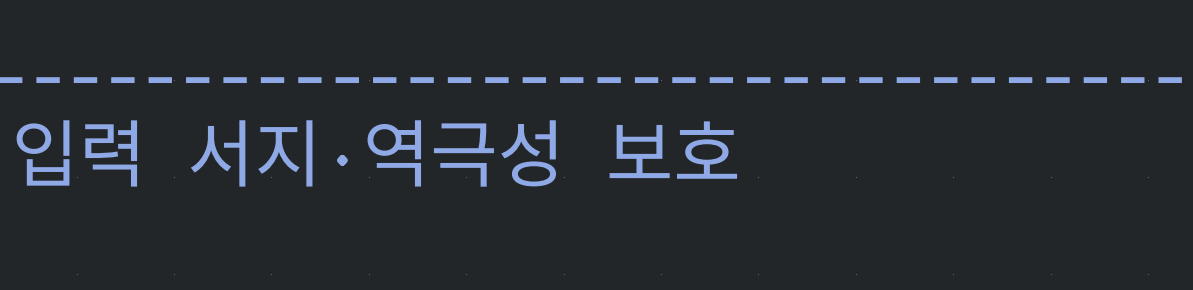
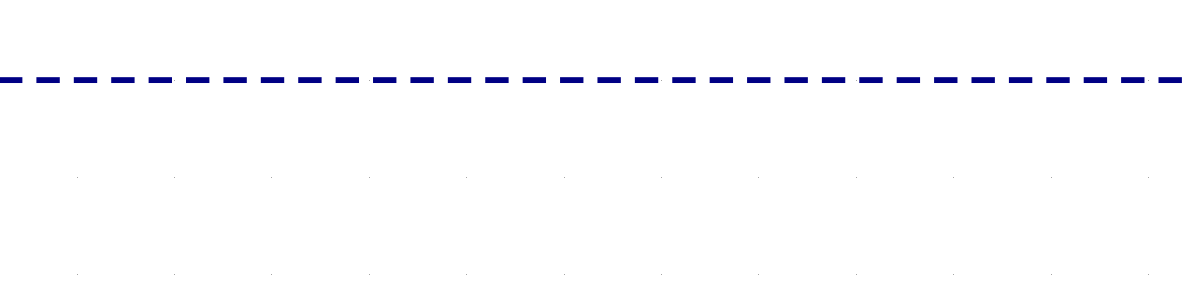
text: 입력 서지·역극성 보호 (376, 153) -> none

